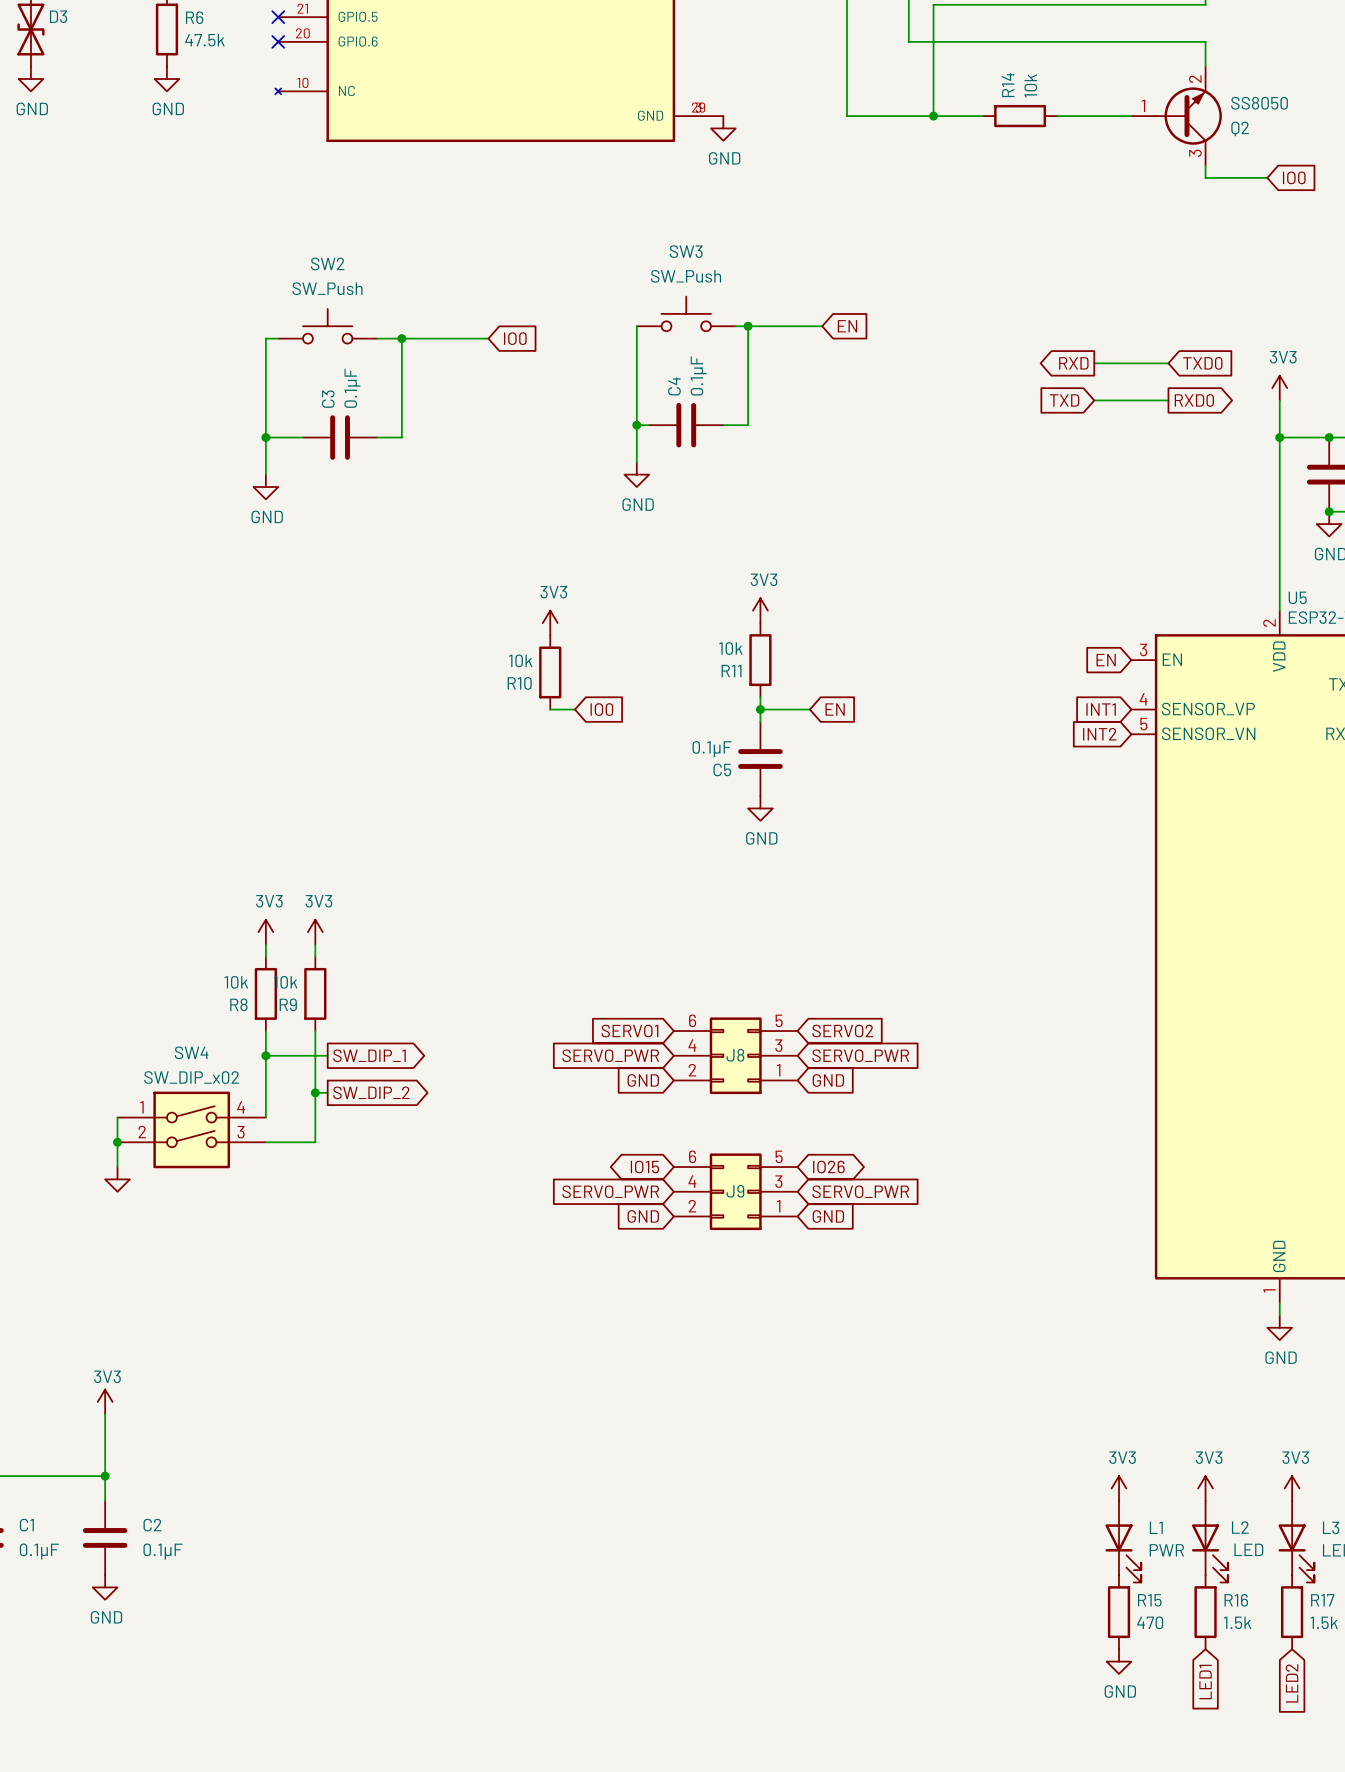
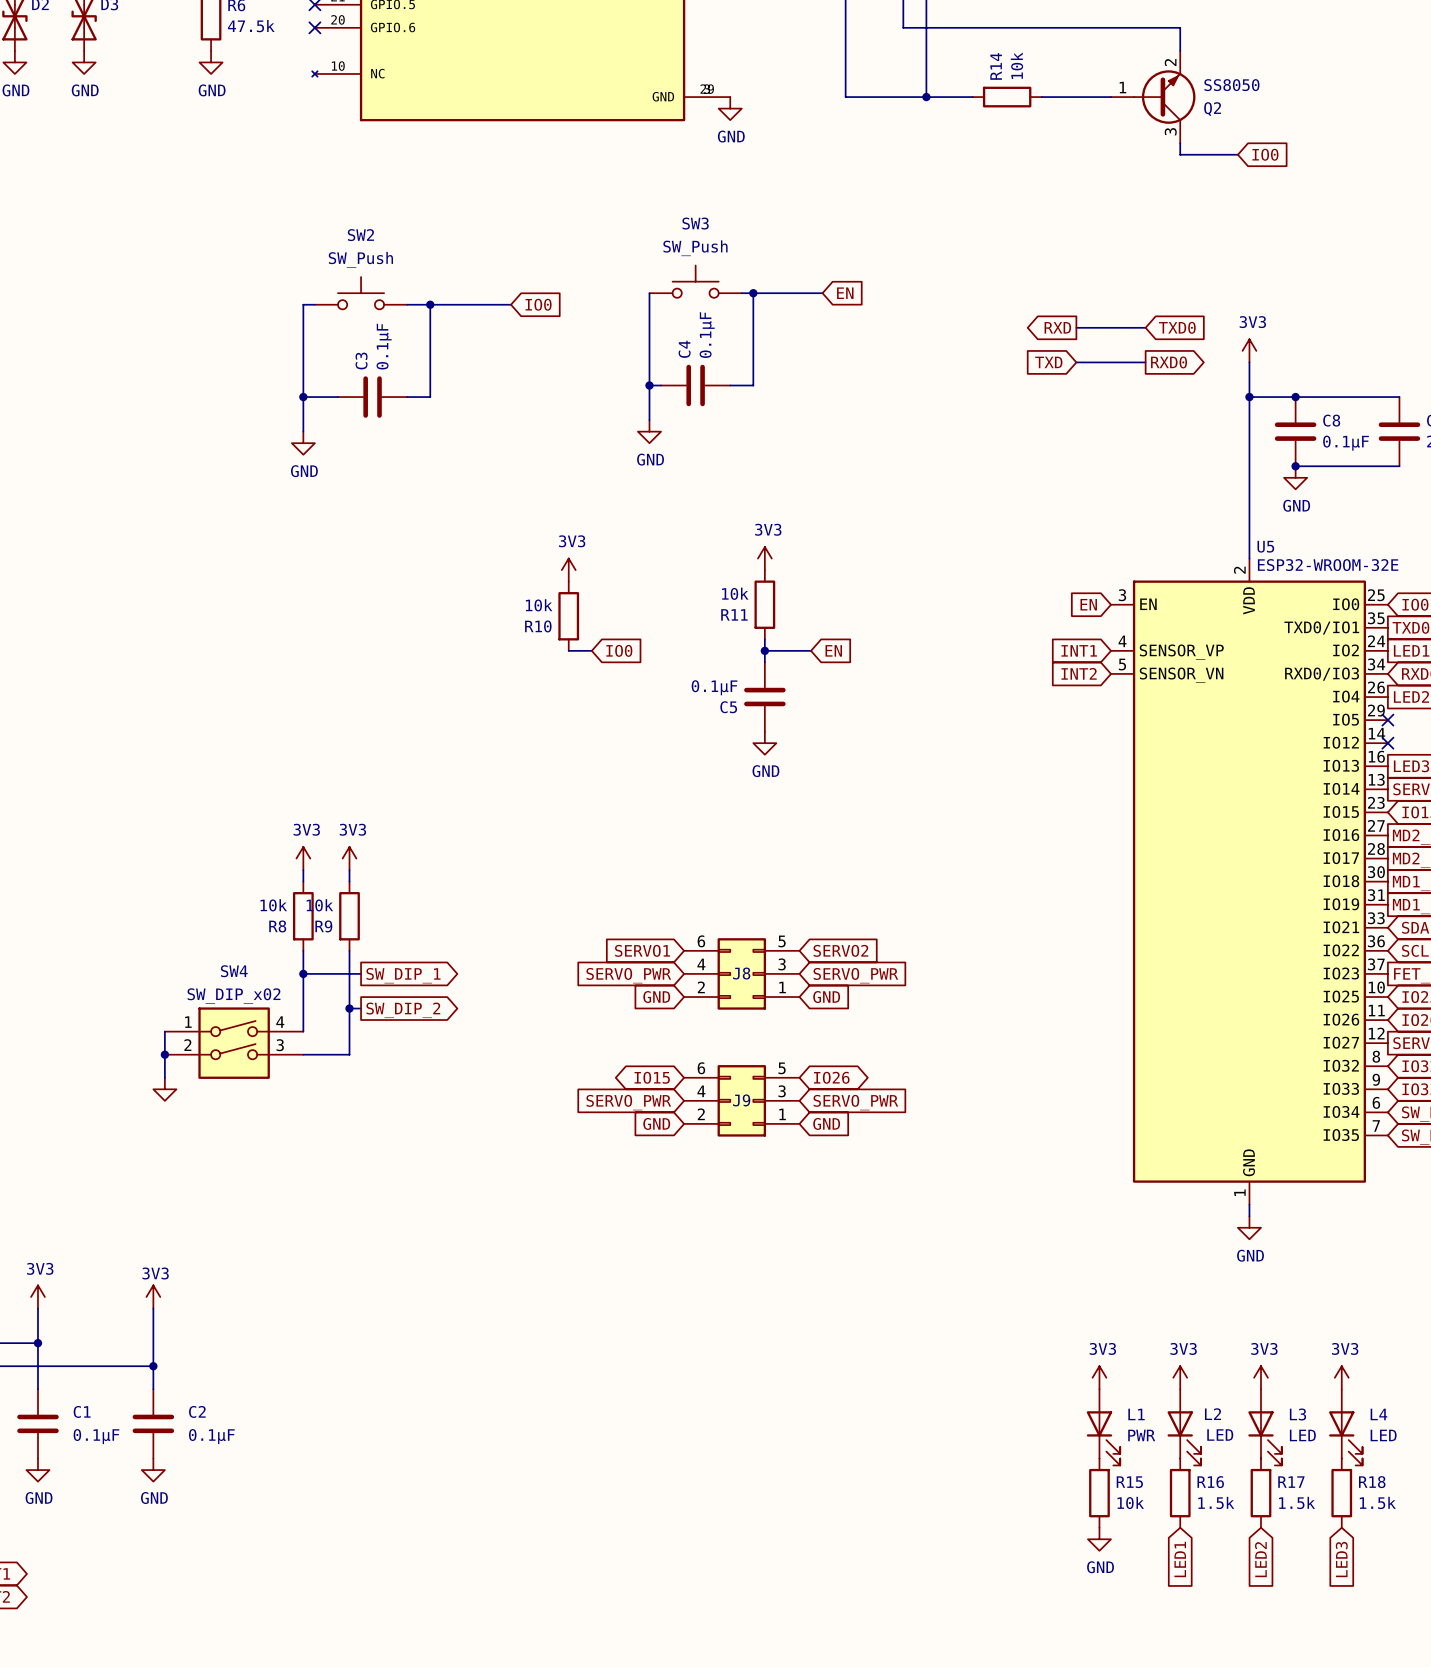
R15 value: 470 (1150, 1622) -> 10k (1130, 1502)

